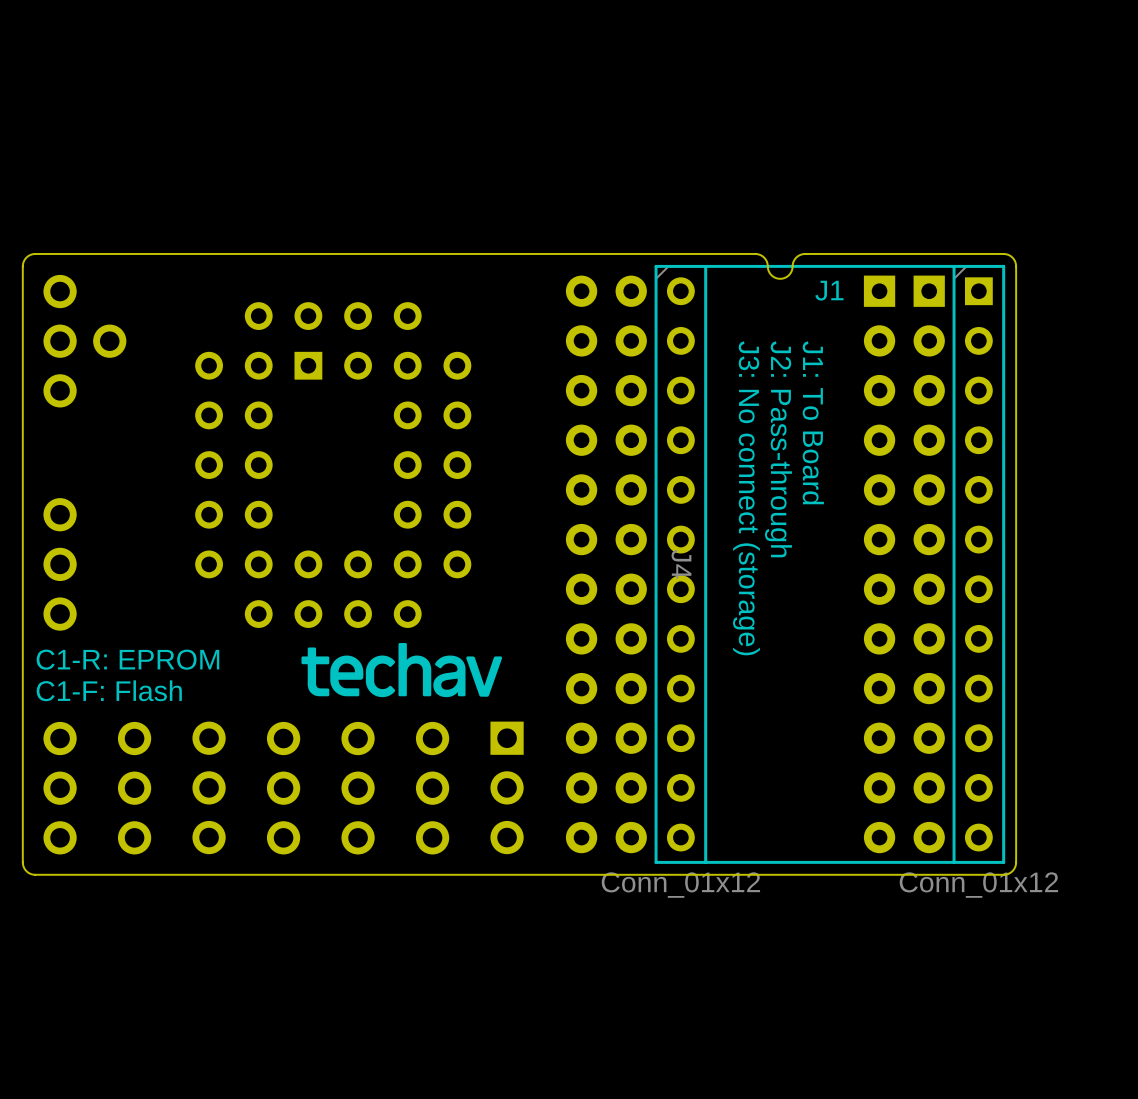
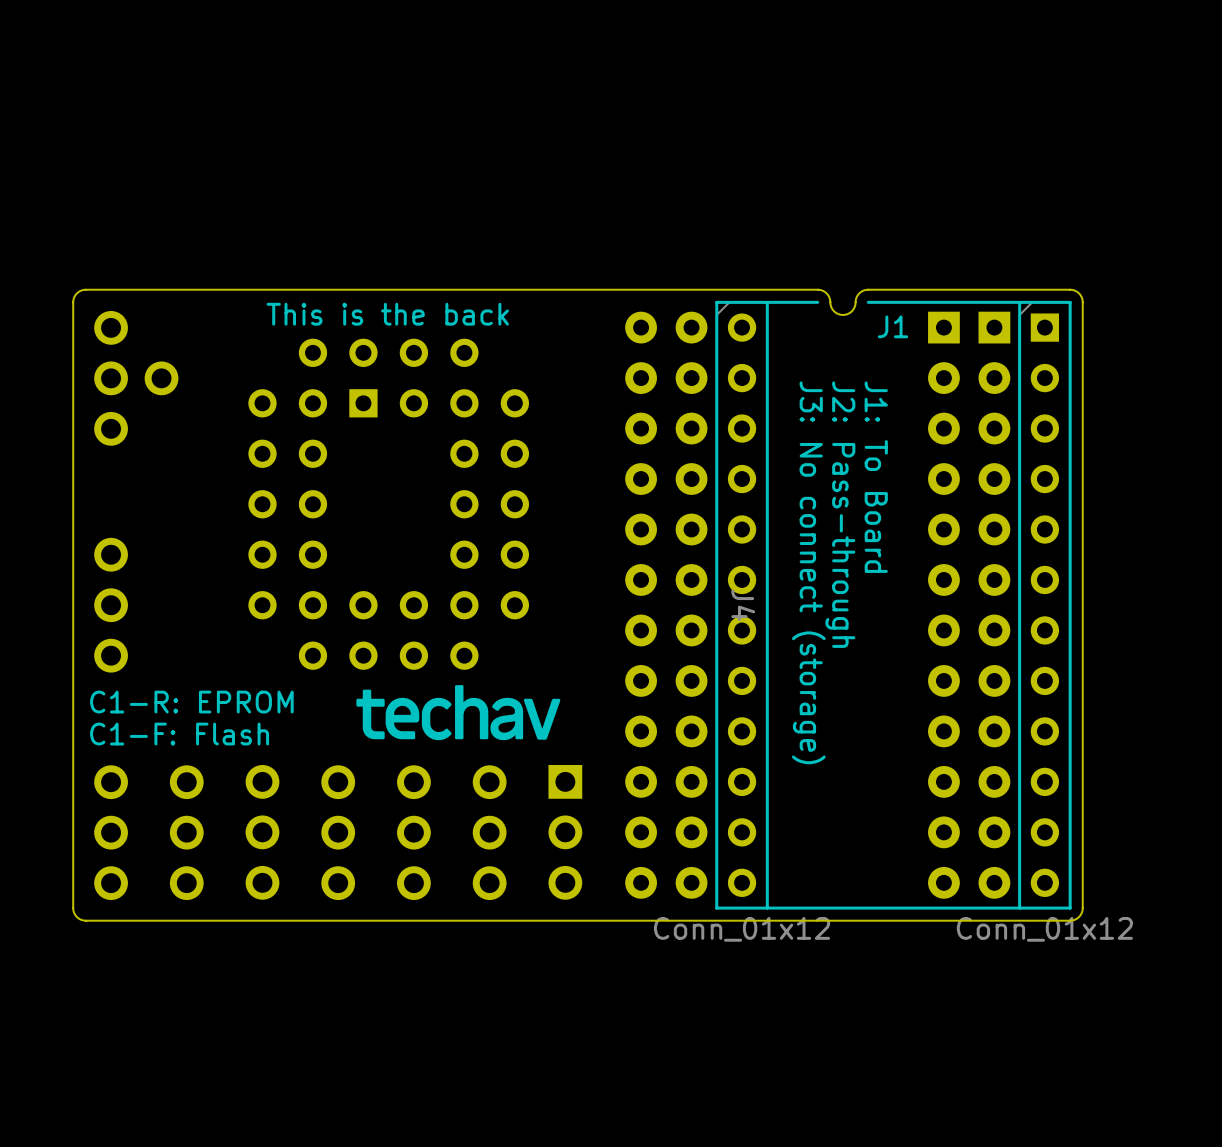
line: (805, 266) (755, 266) -> none
text: none -> This is the back (387, 314)

